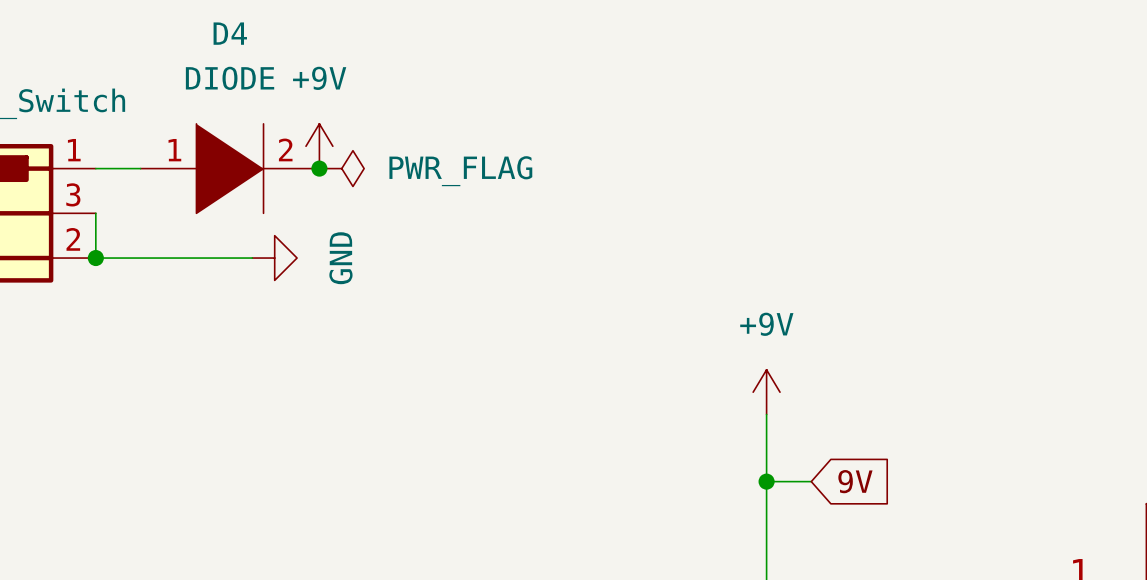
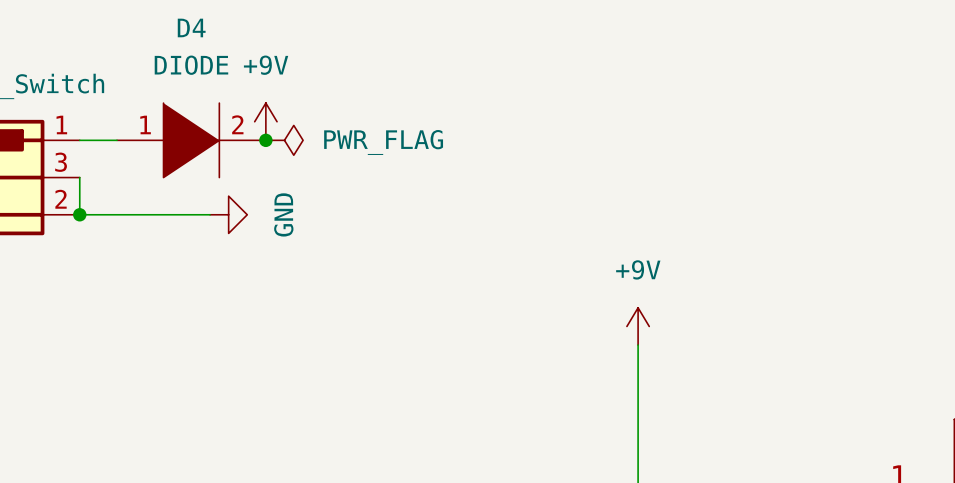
wire: (766, 481) (811, 481) -> none
junction: (766, 481) -> none
global label: 9V (855, 481) -> none

